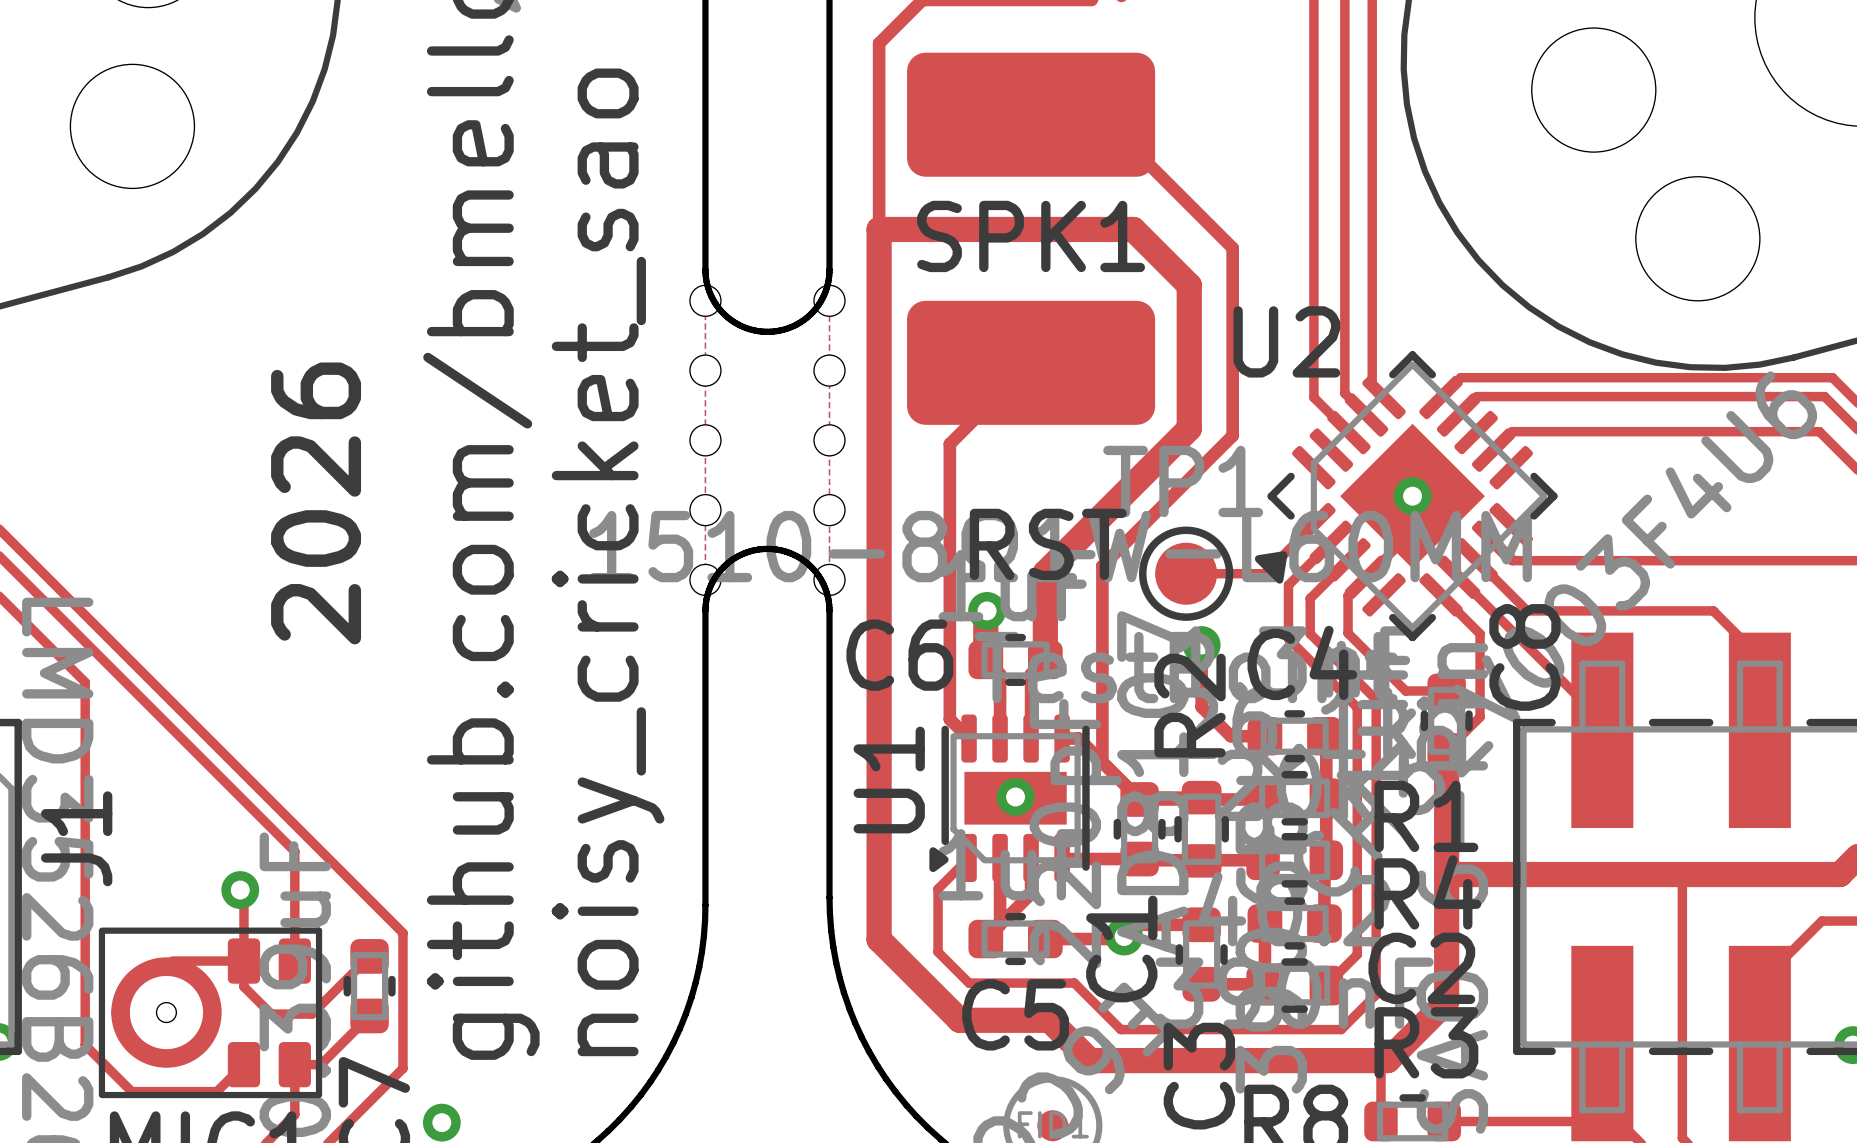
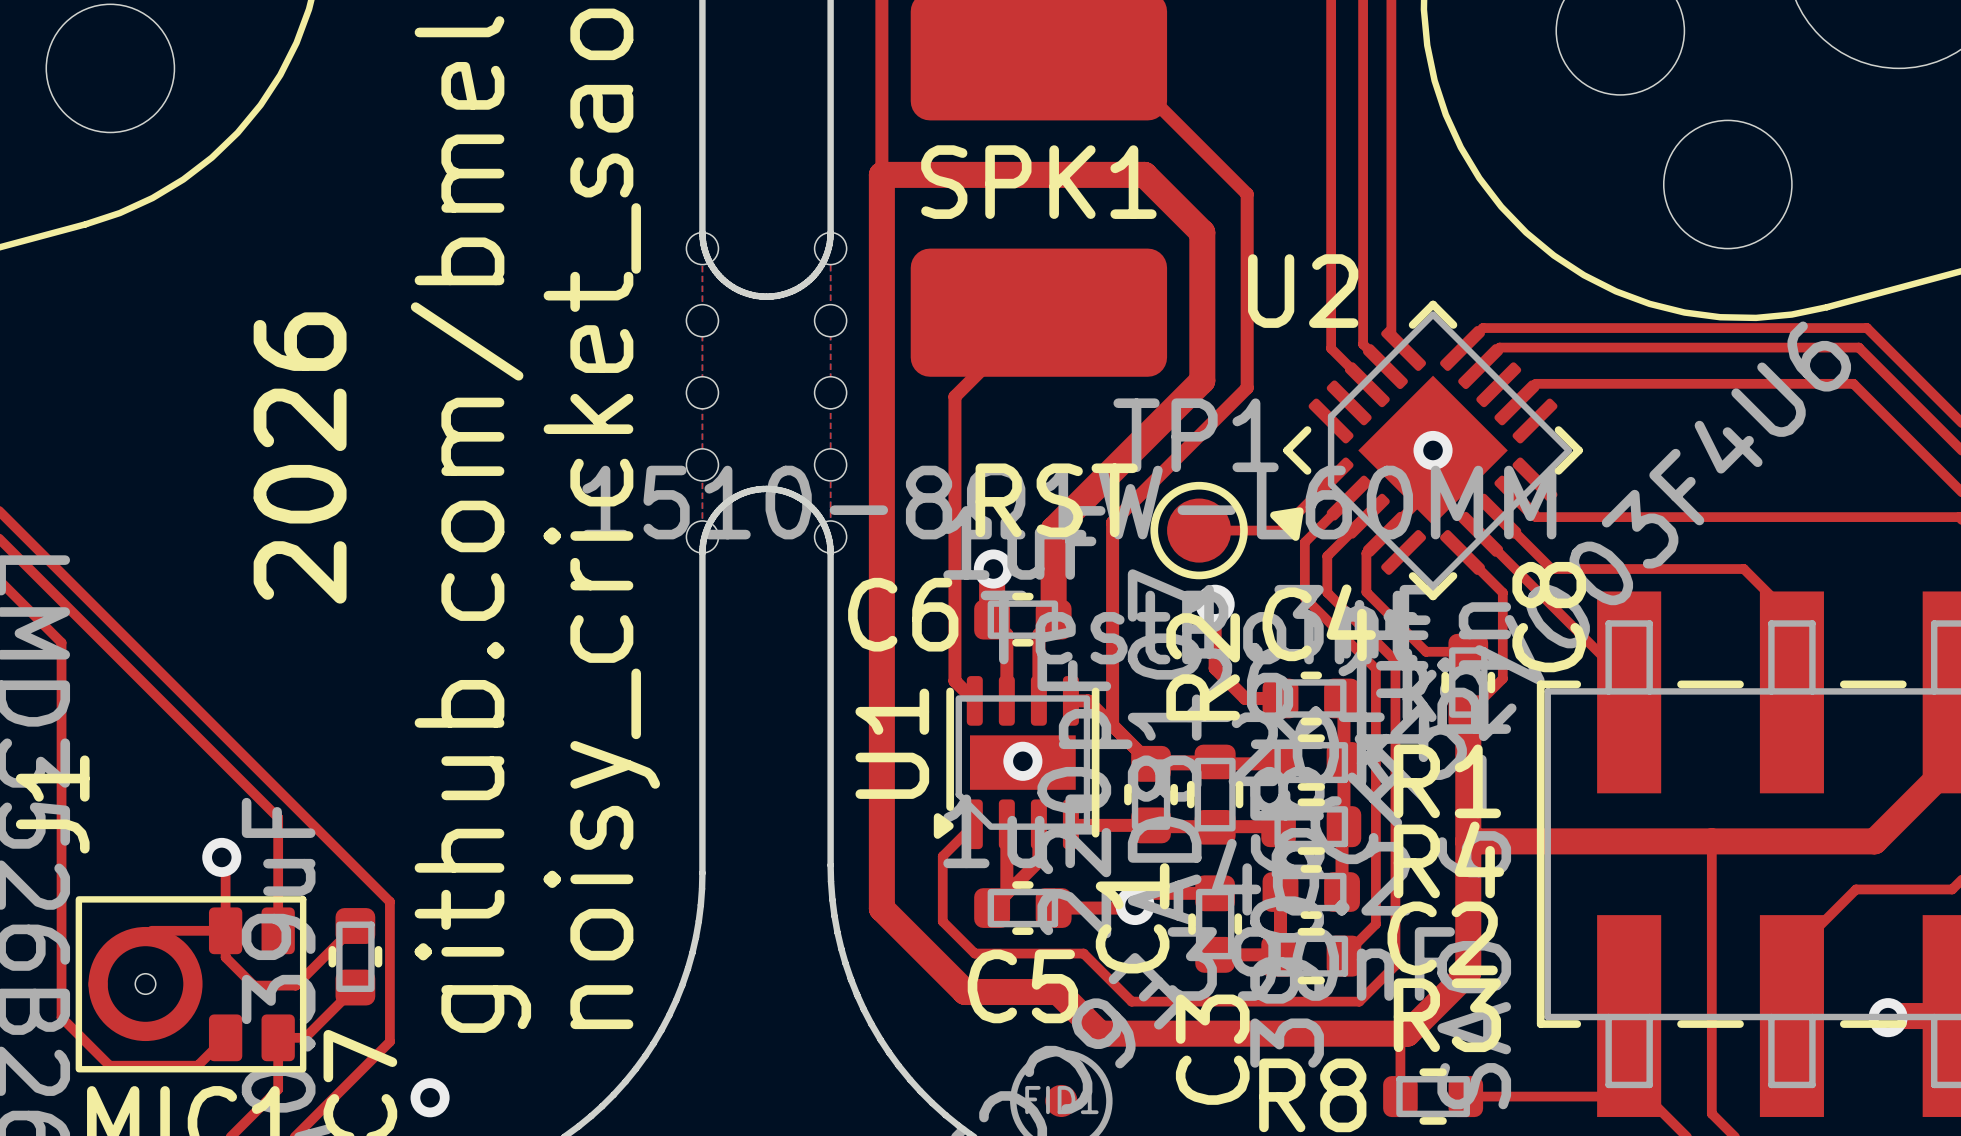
board edge: (705, 269) (710, 293) (723, 313) (743, 327) (767, 331) (791, 327) (811, 313) (824, 293) (829, 269) -> (702, 216) (704, 248) (709, 262) (716, 273) (728, 284) (739, 290) (753, 295) (766, 296) (779, 295) (793, 290) (804, 284) (816, 273) (823, 262) (828, 248) (830, 216)
board edge: (705, 610) (710, 587) (723, 567) (743, 553) (767, 548) (791, 553) (811, 567) (824, 587) (829, 610) -> (702, 568) (704, 537) (709, 522) (716, 512) (728, 501) (739, 495) (753, 490) (766, 488) (779, 490) (793, 495) (804, 501) (816, 512) (823, 522) (828, 537) (830, 568)

